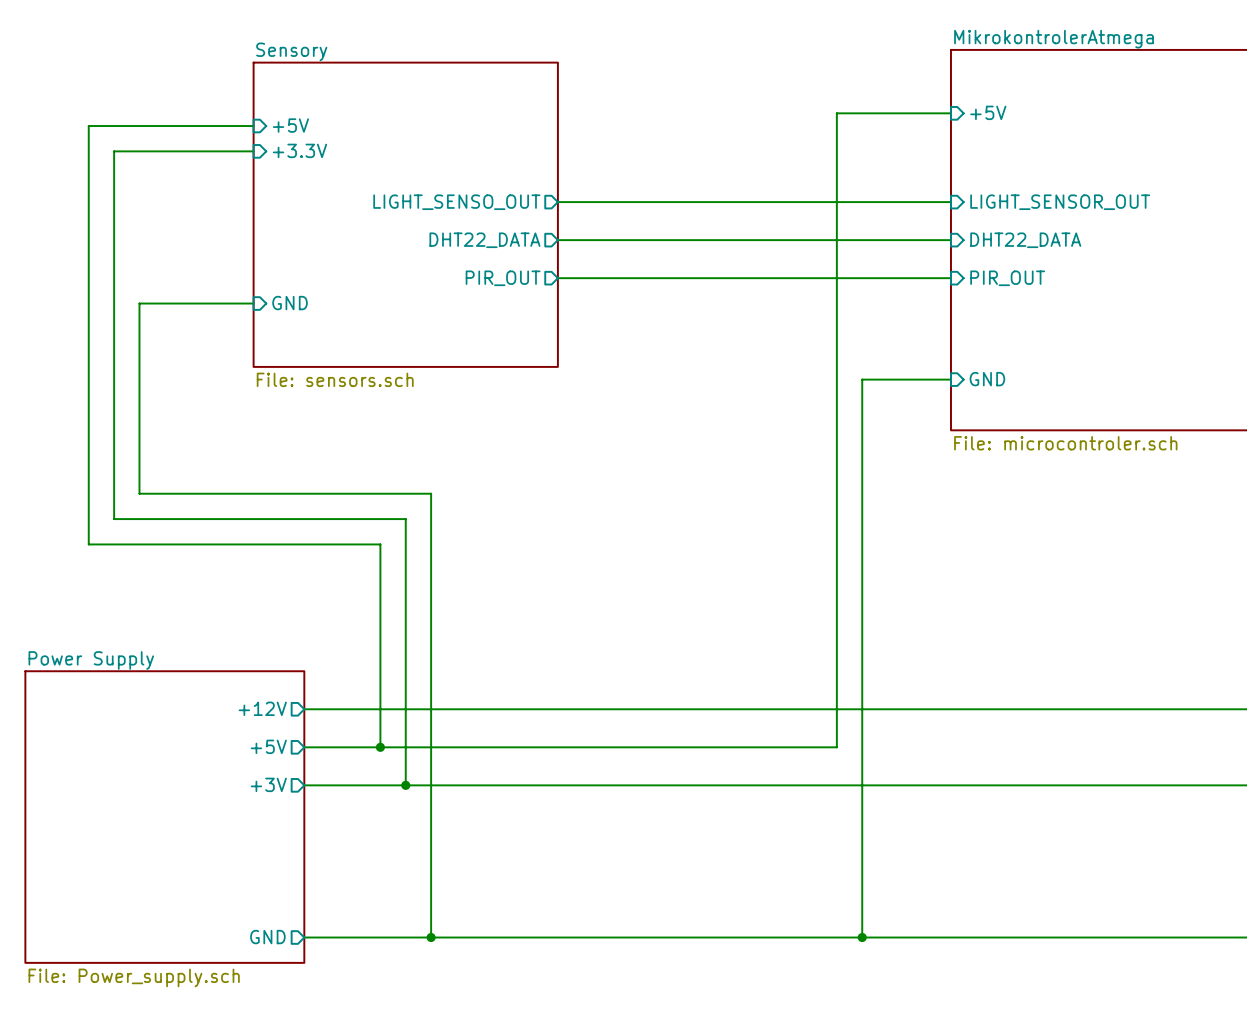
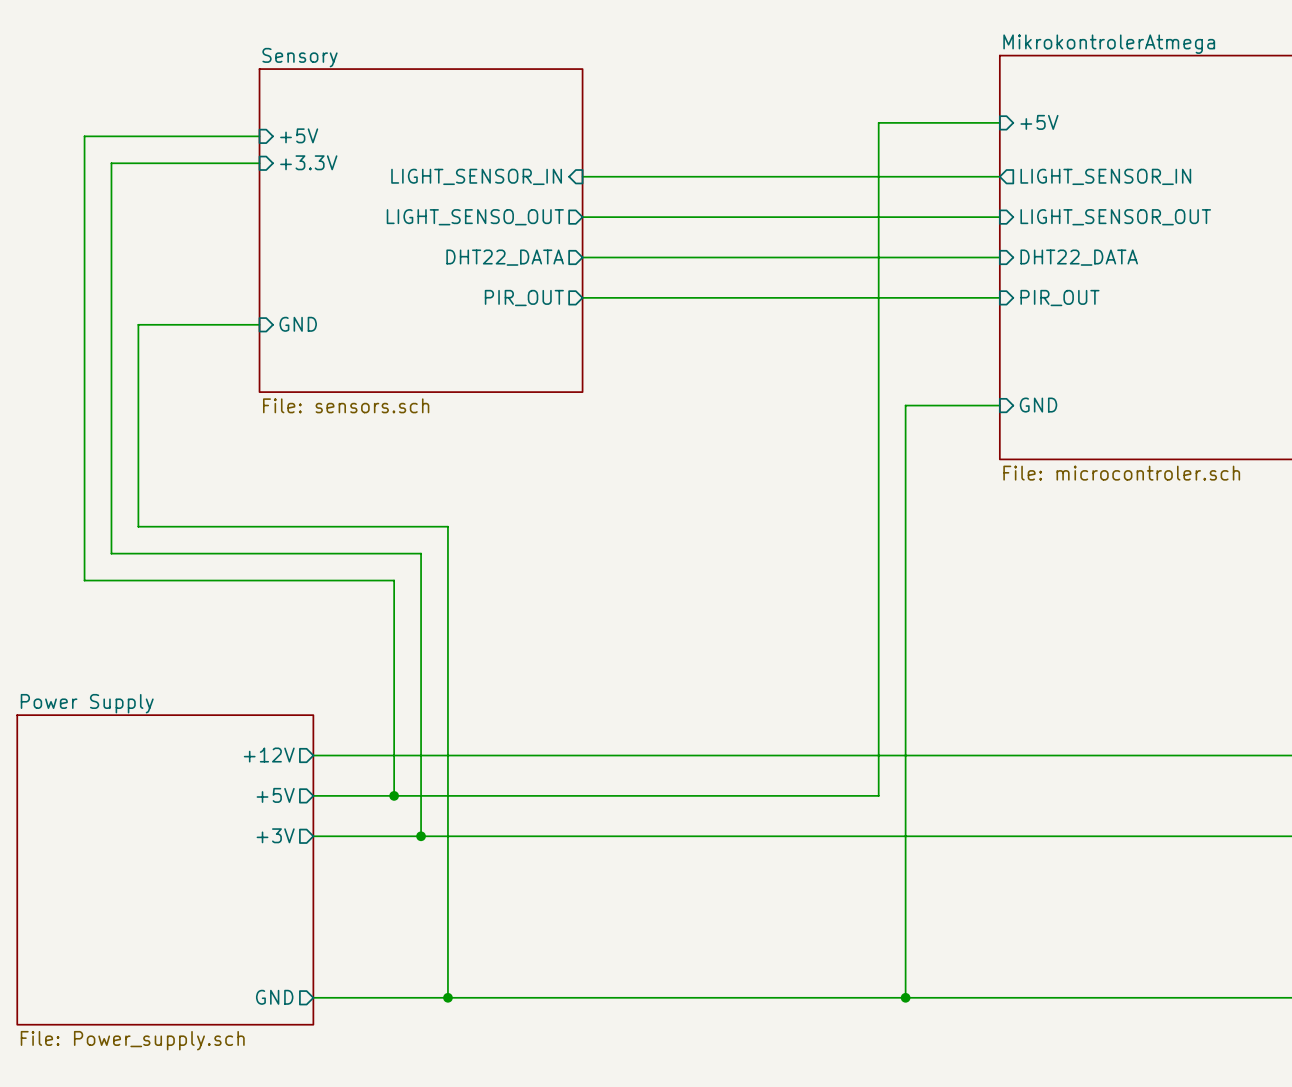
sheet pin: none -> LIGHT_SENSOR_IN (476, 176)
wire: none -> (582, 176) (999, 176)
sheet pin: none -> LIGHT_SENSOR_IN (1105, 176)

